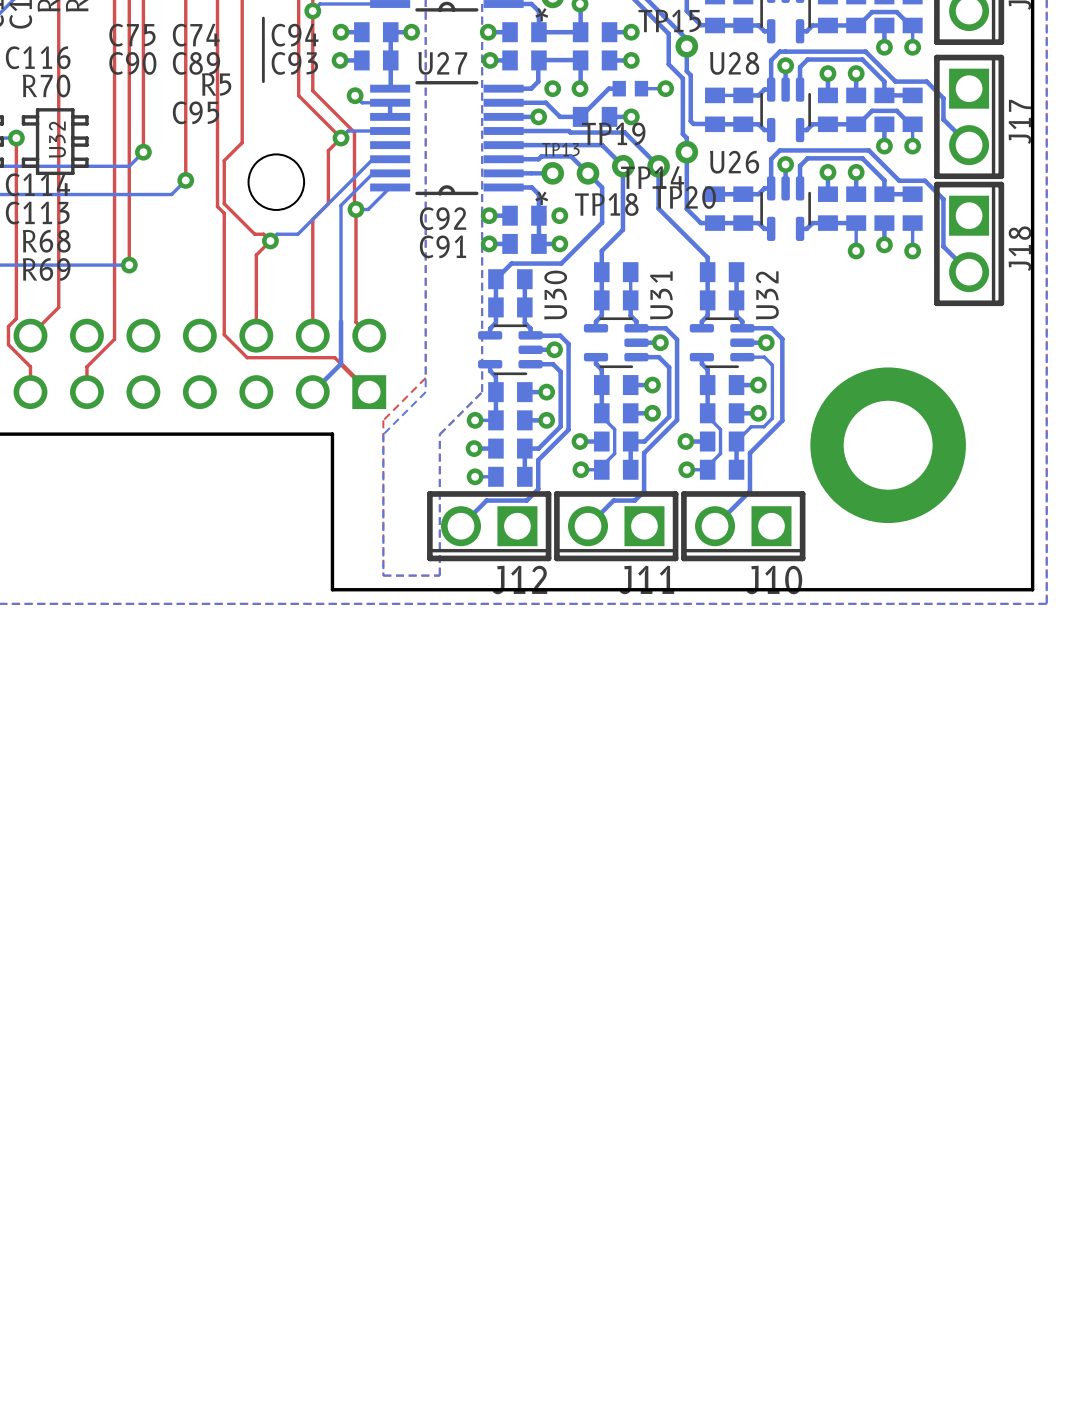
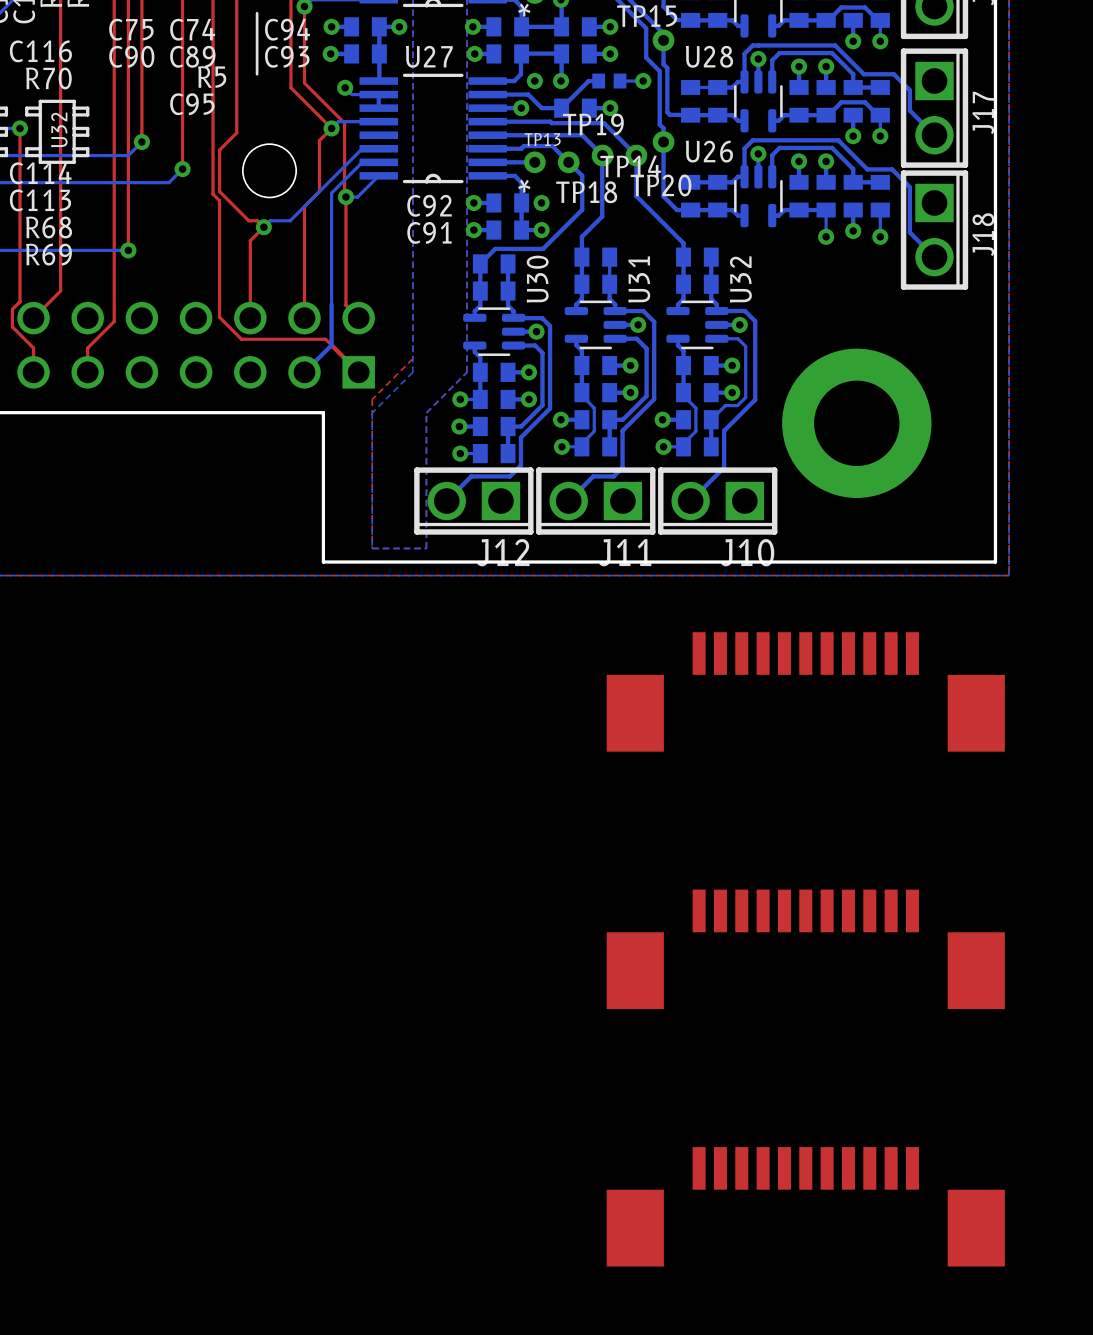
part: none -> (805, 691)
part: none -> (805, 949)
part: none -> (805, 1206)

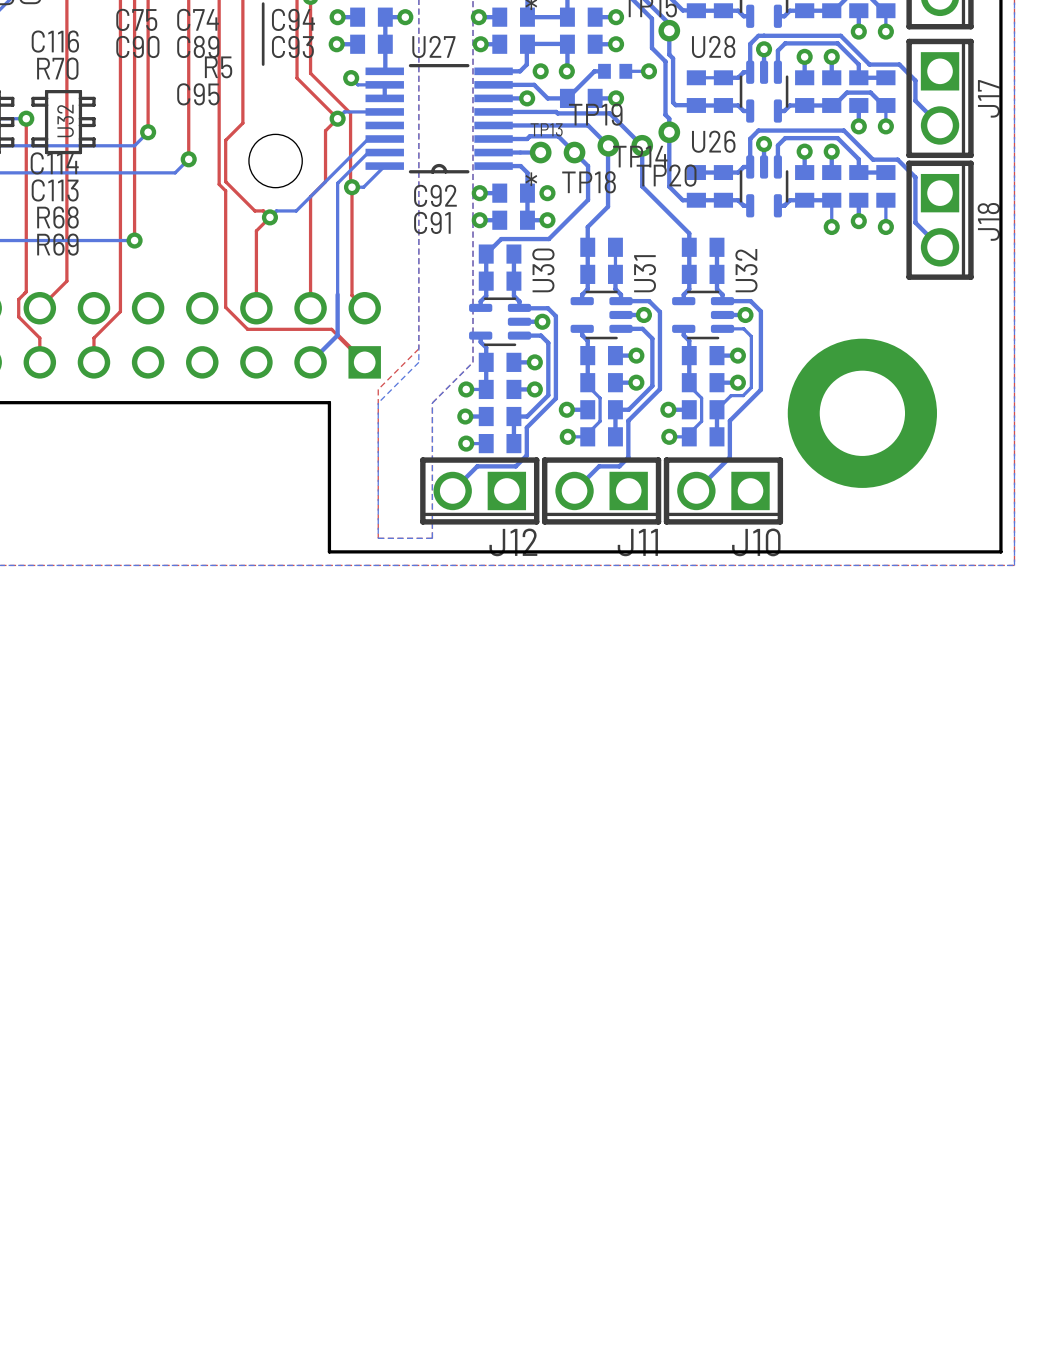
part: (805, 691) -> none
part: (805, 949) -> none
part: (805, 1206) -> none

